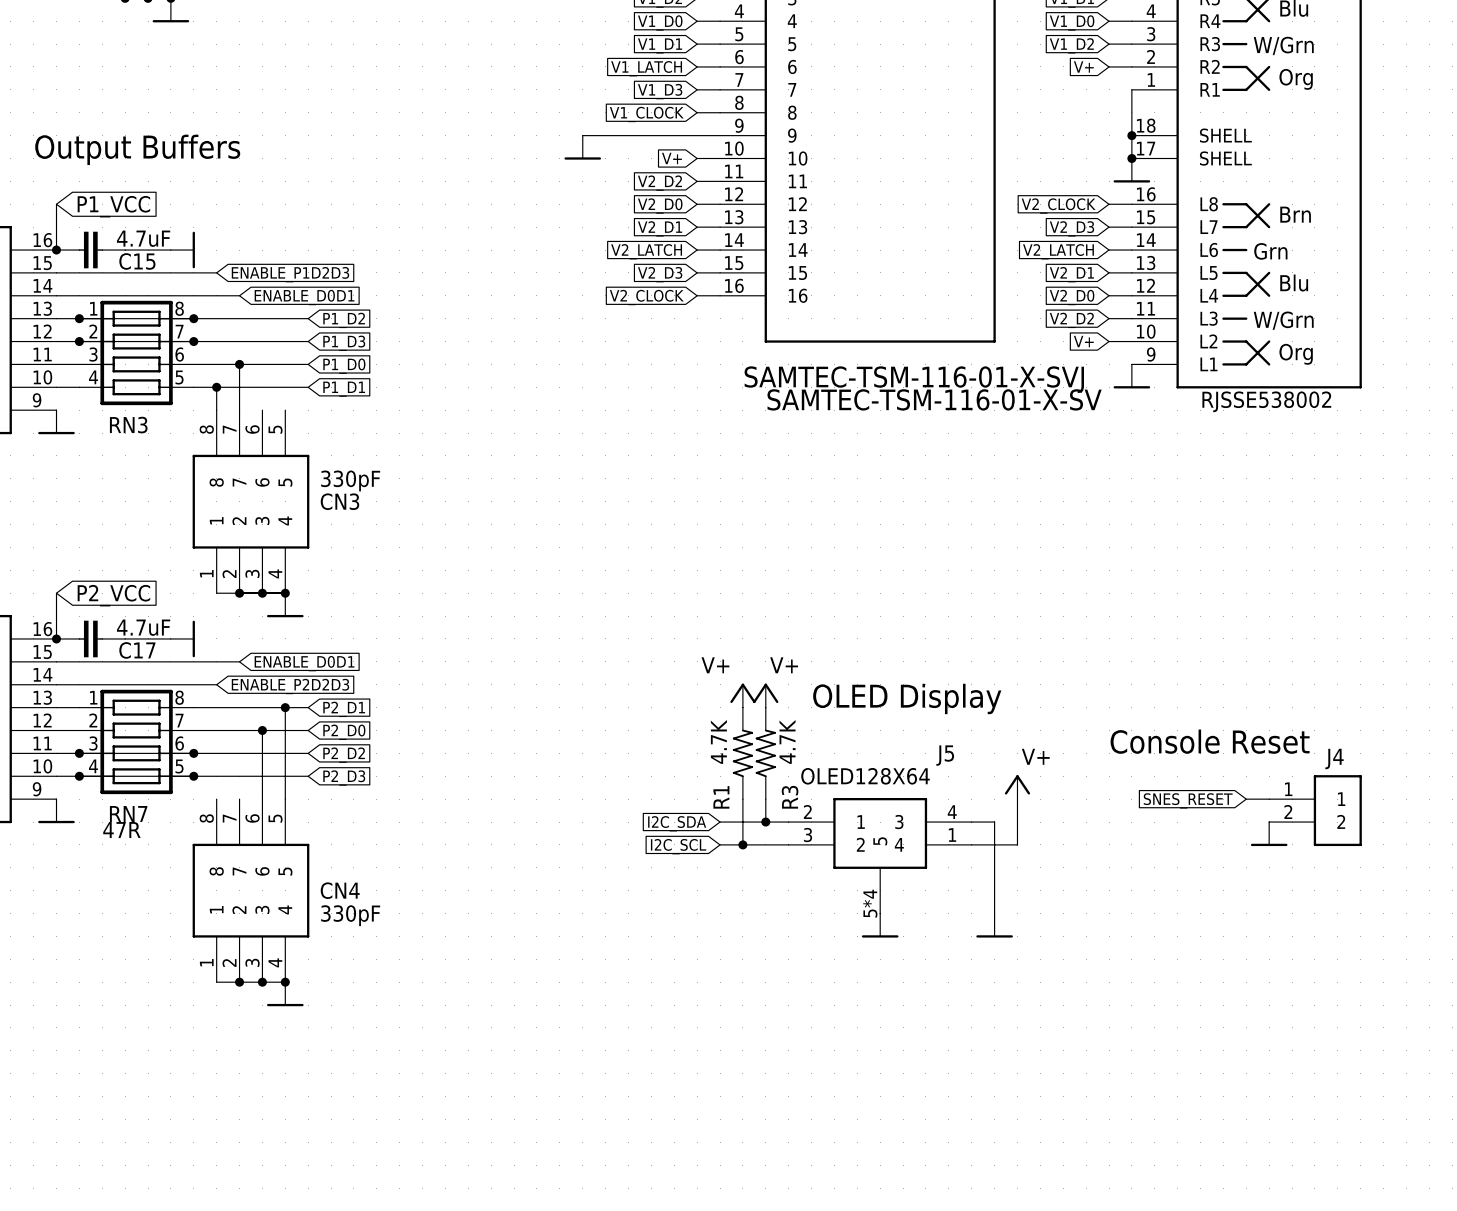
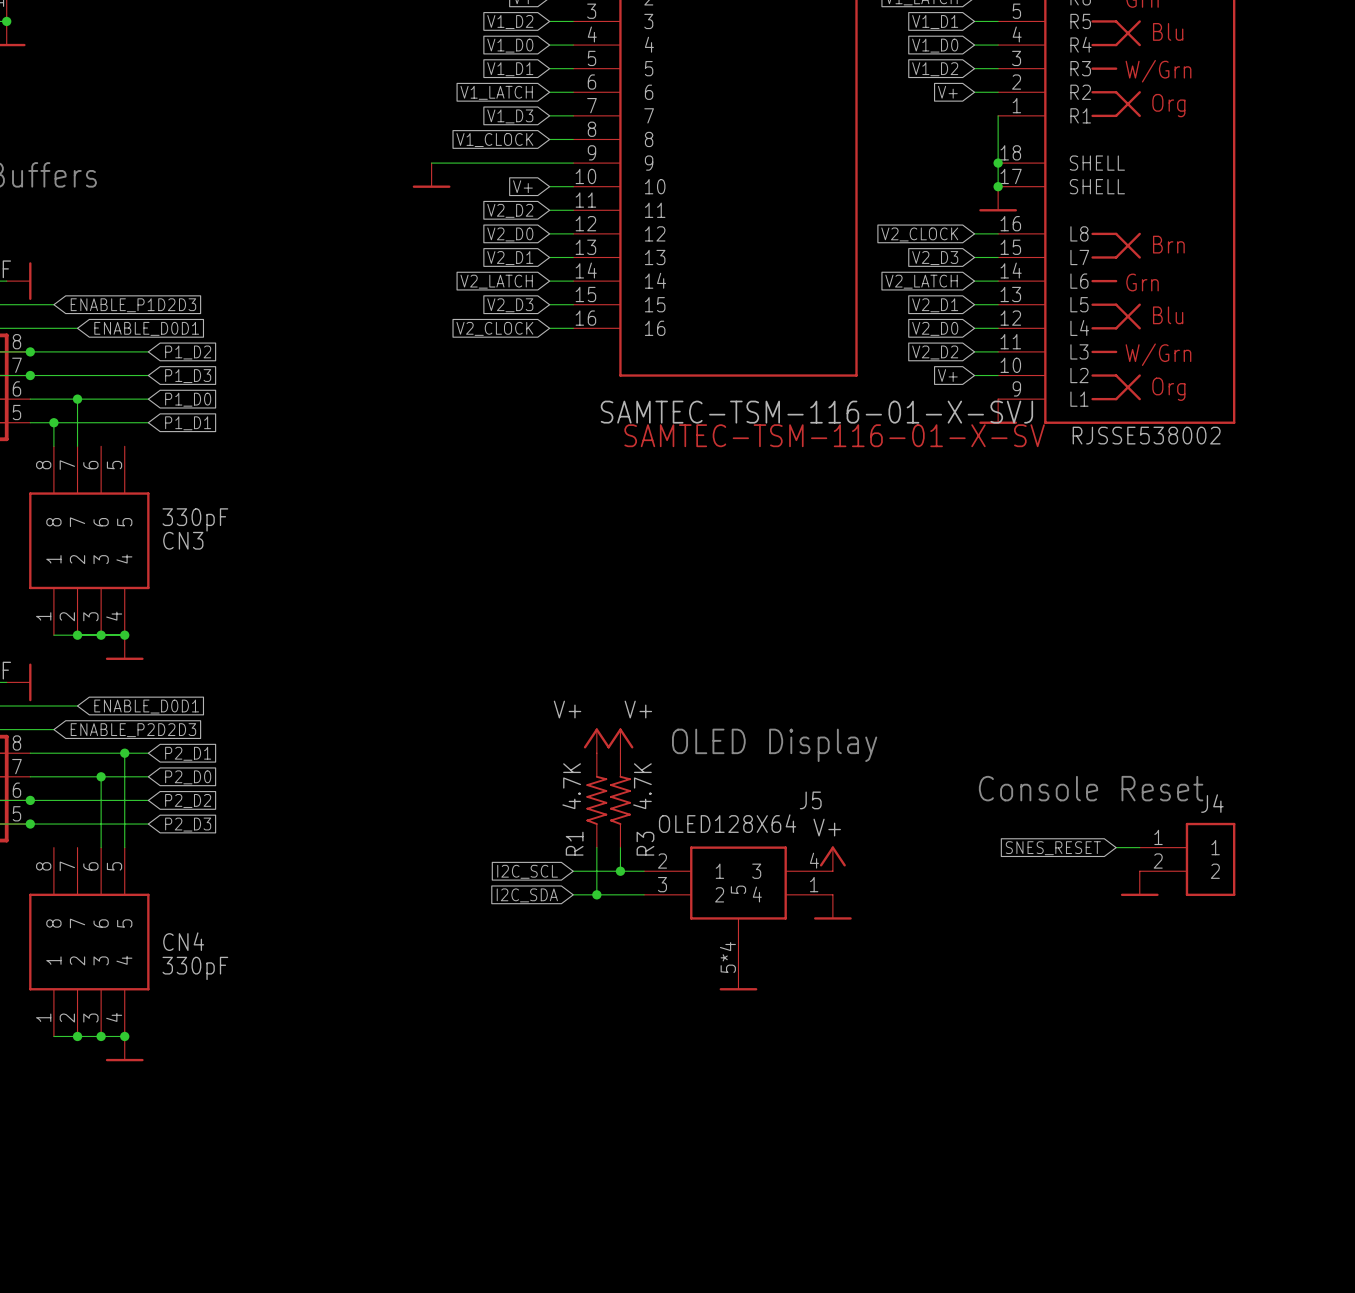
power symbol text position: V+ (1035, 756) -> V+ (827, 827)
power symbol position: V+ (1017, 787) -> V+ (832, 858)
wire: (1017, 799) (1017, 844) (971, 844) -> none
wire: (971, 822) (994, 822) (994, 913) -> none
global label: I2C_SDA (677, 823) -> I2C_SCL (527, 871)
global label: I2C_SCL (678, 846) -> I2C_SDA (527, 895)
power symbol position: (994, 925) -> (832, 907)

